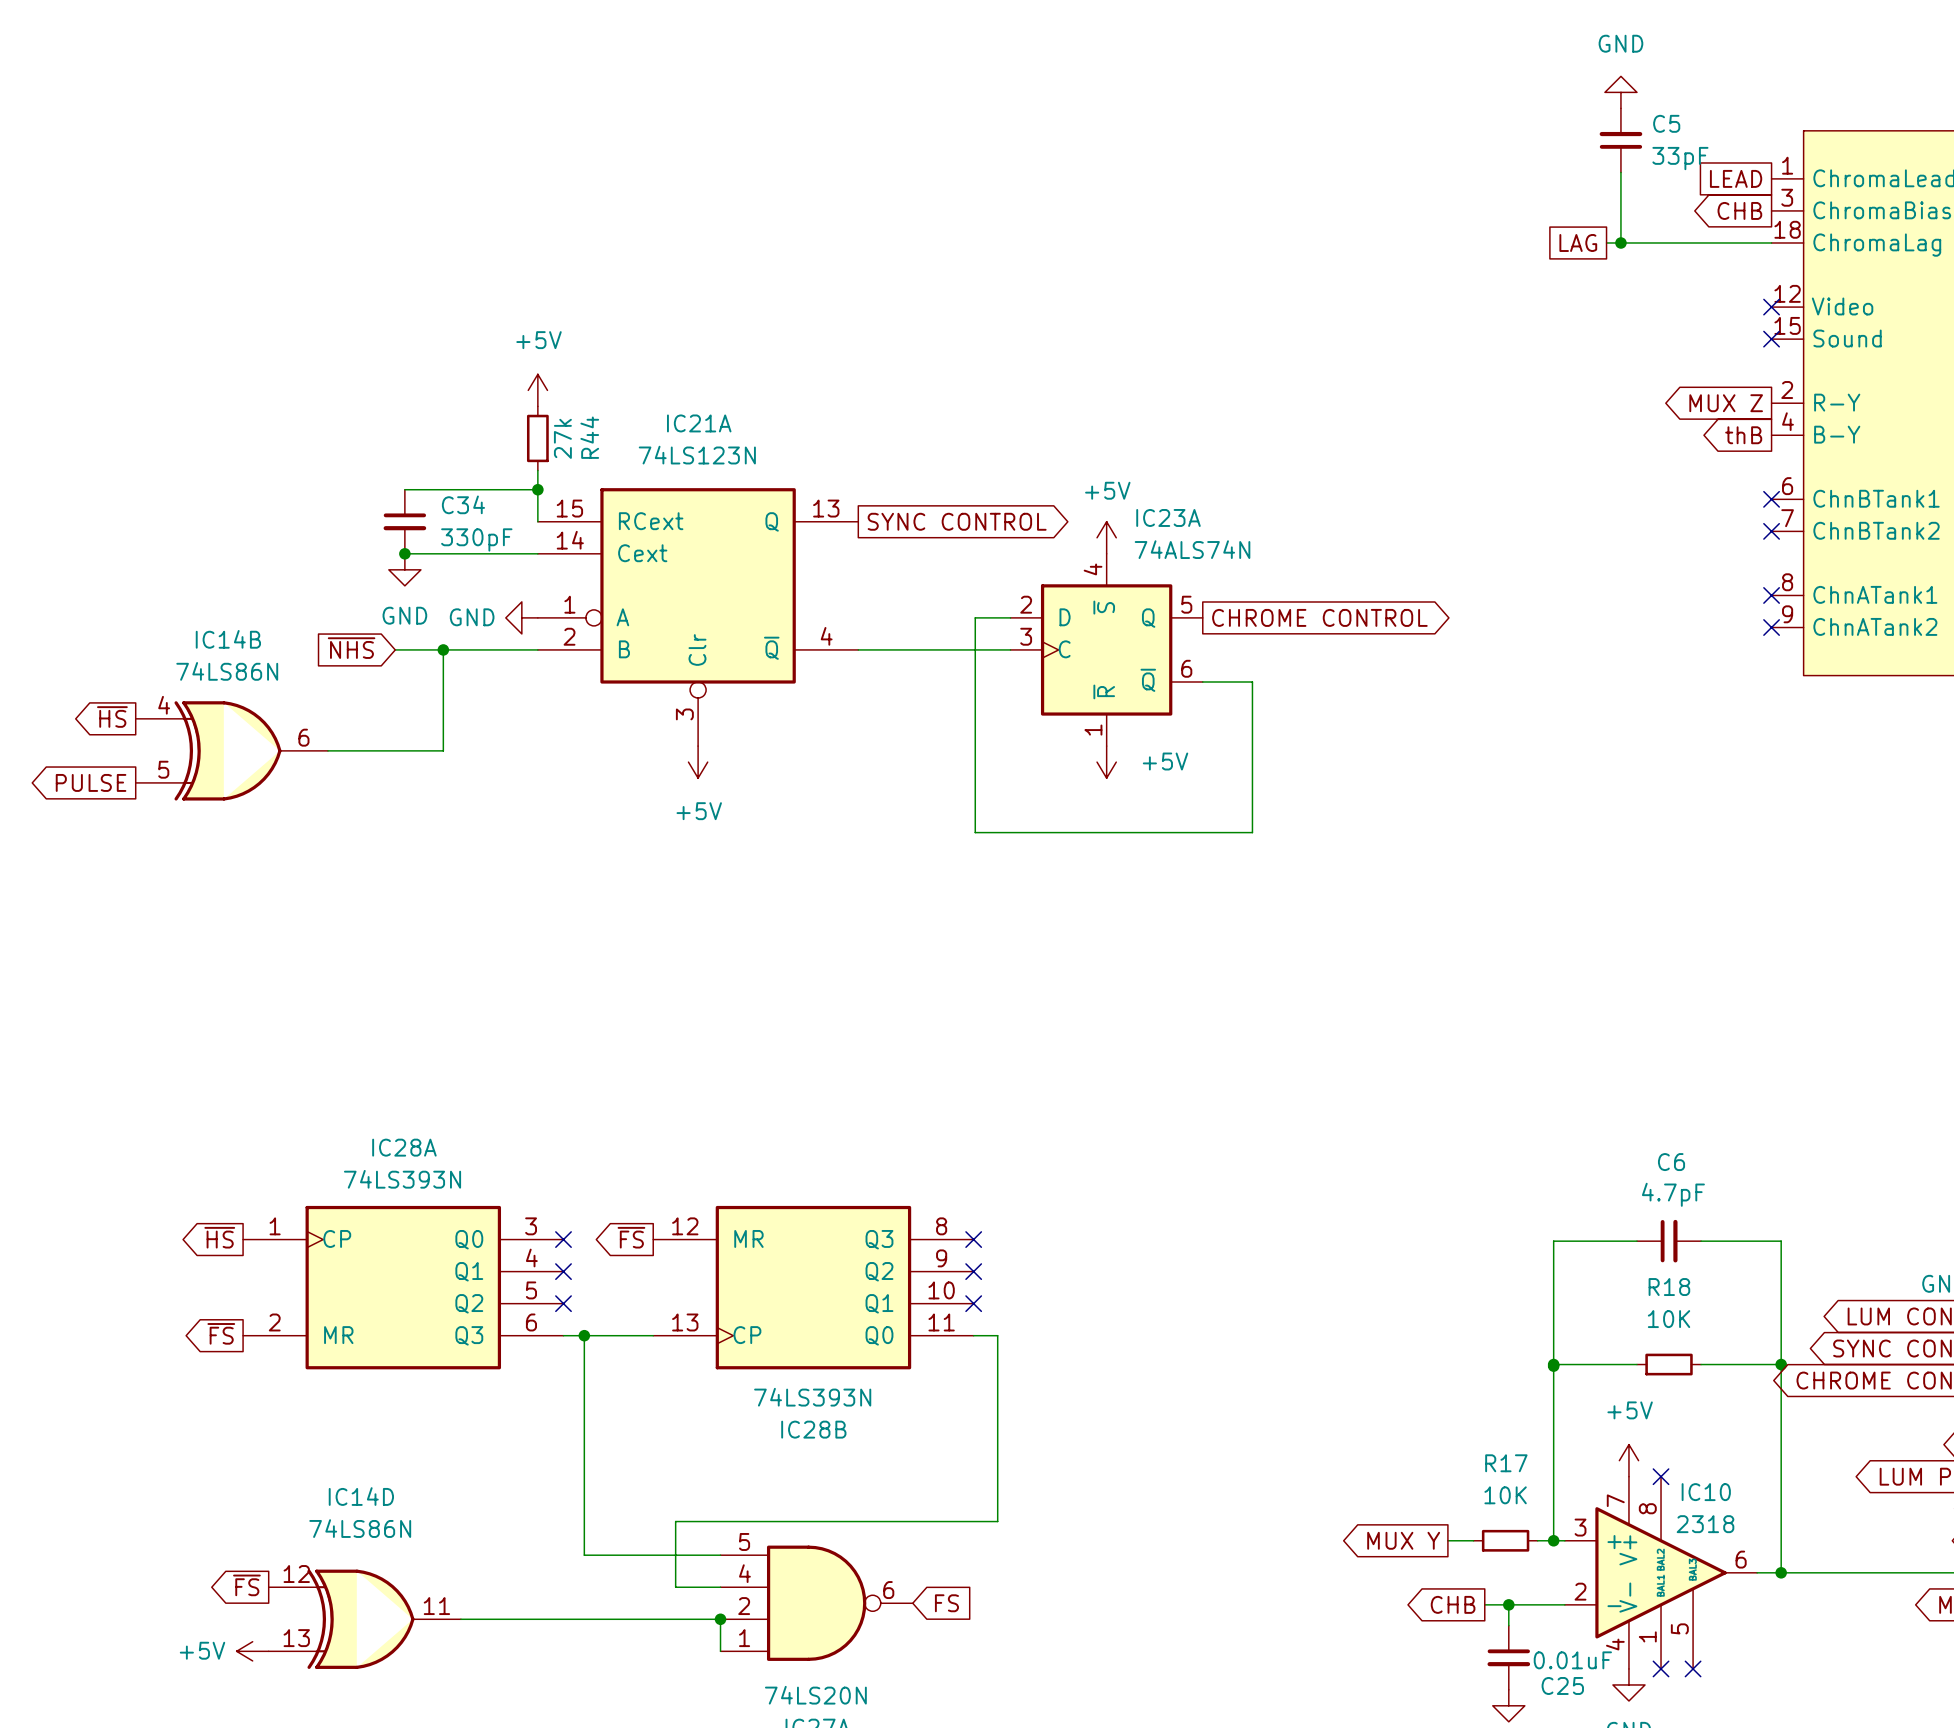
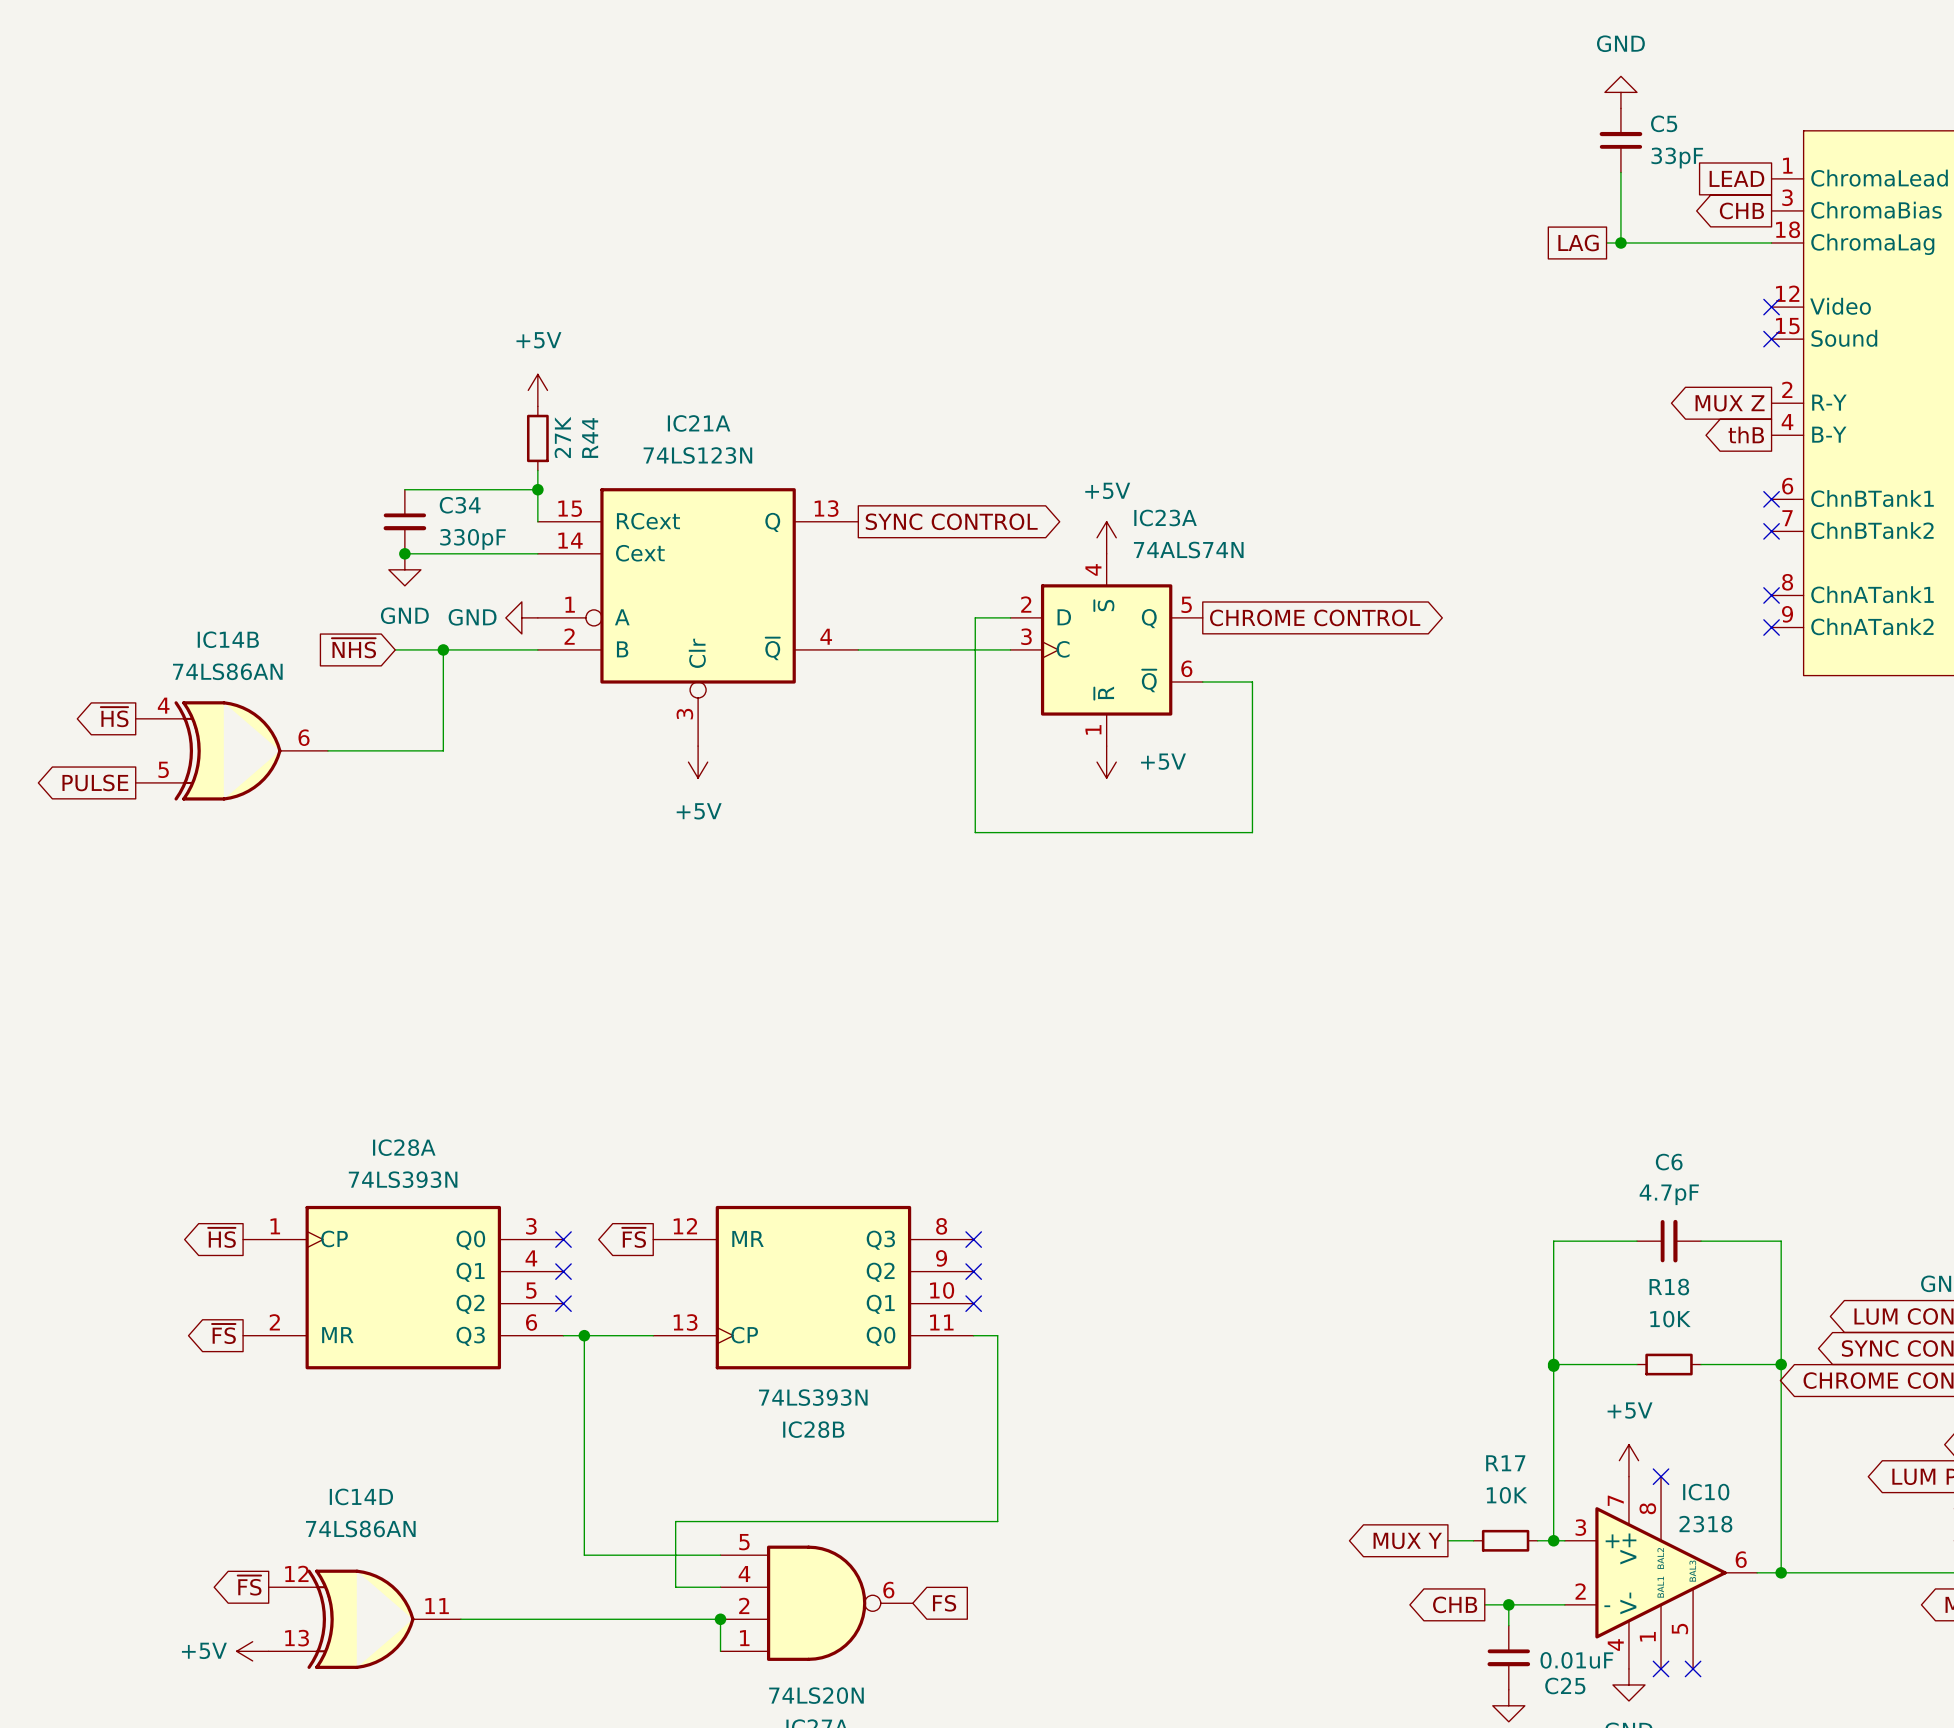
R44 value: 27k (562, 438) -> 27K (562, 437)
IC14B value: 74LS86N (227, 671) -> 74LS86AN (227, 671)
IC14D value: 74LS86N (360, 1528) -> 74LS86AN (360, 1528)

